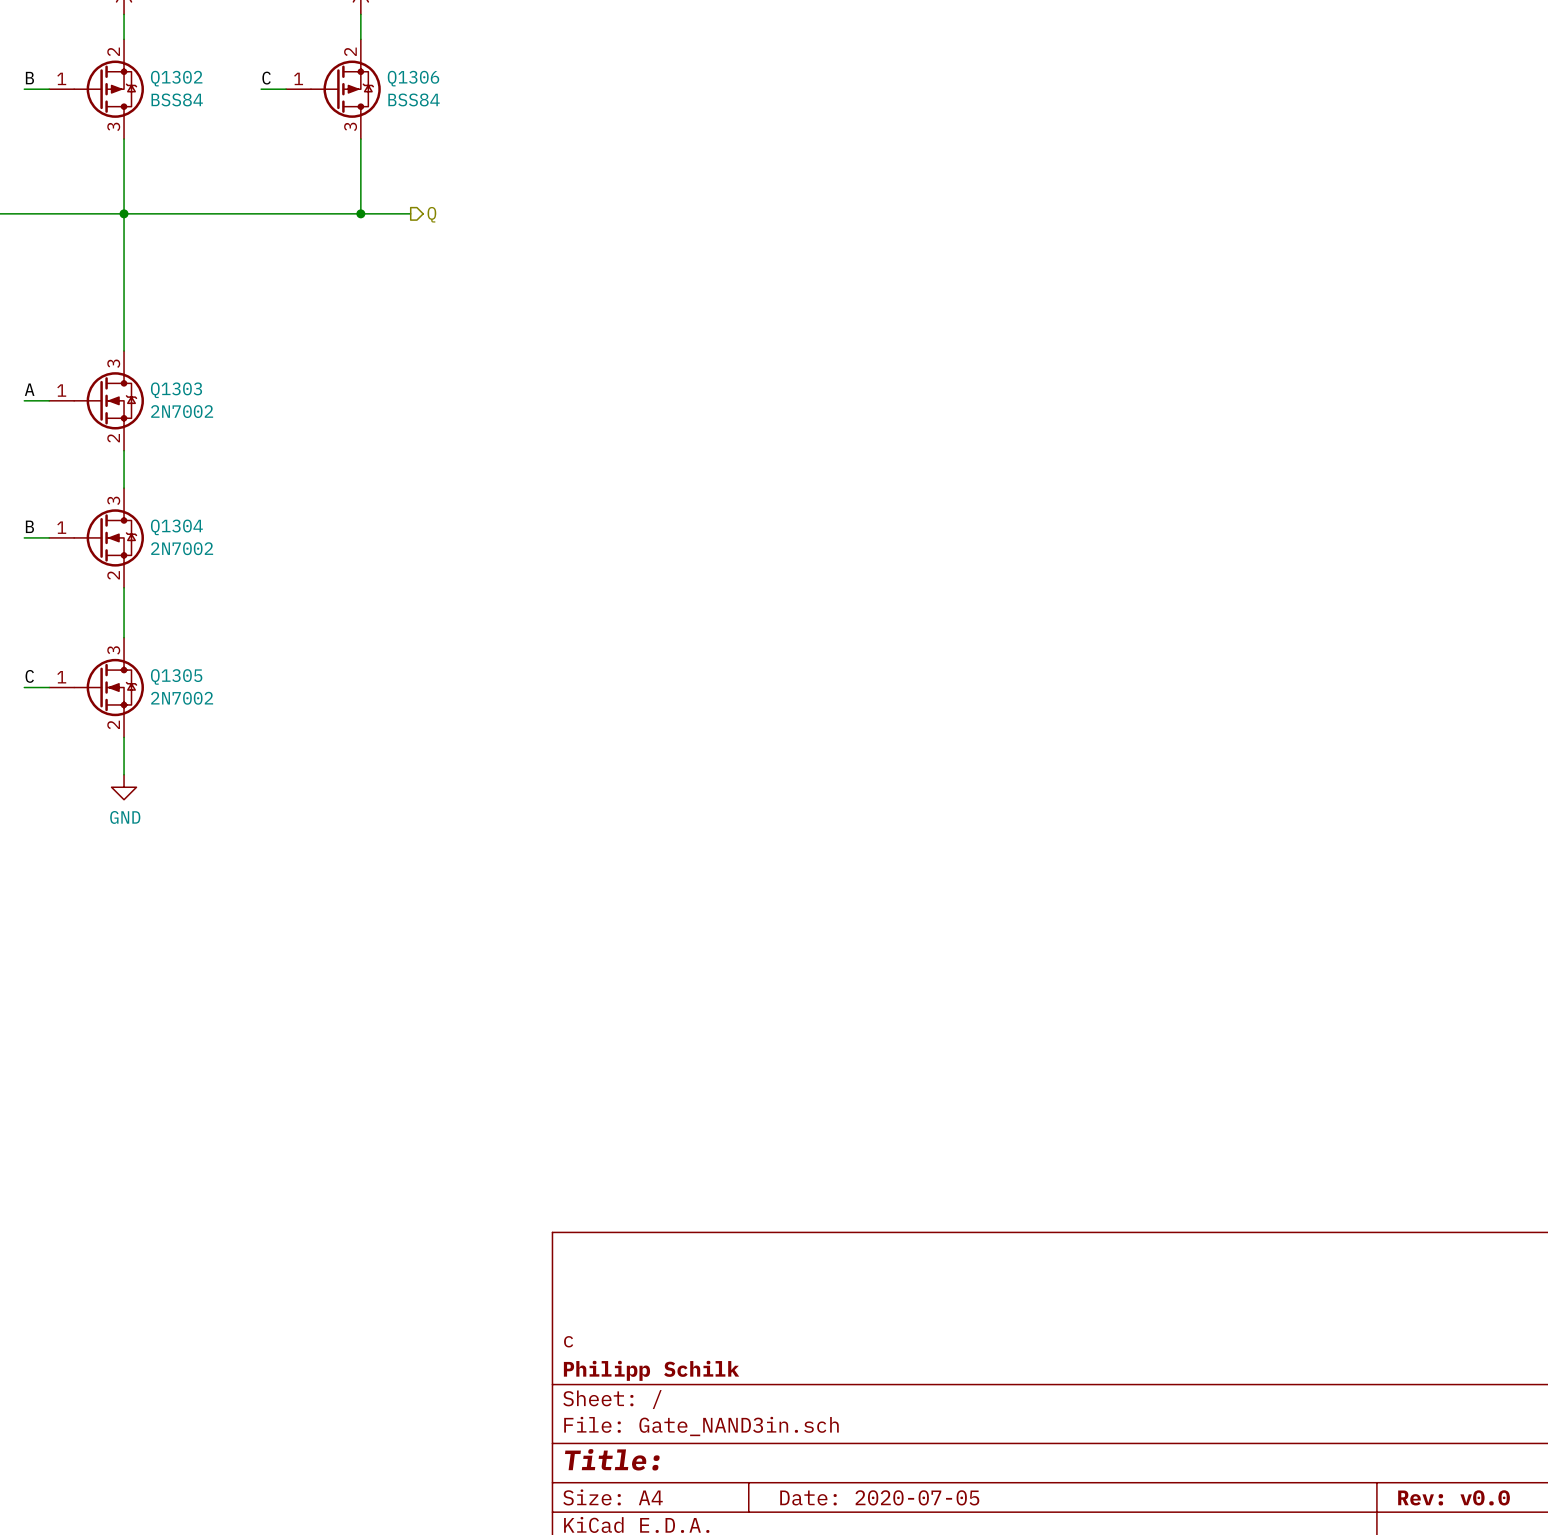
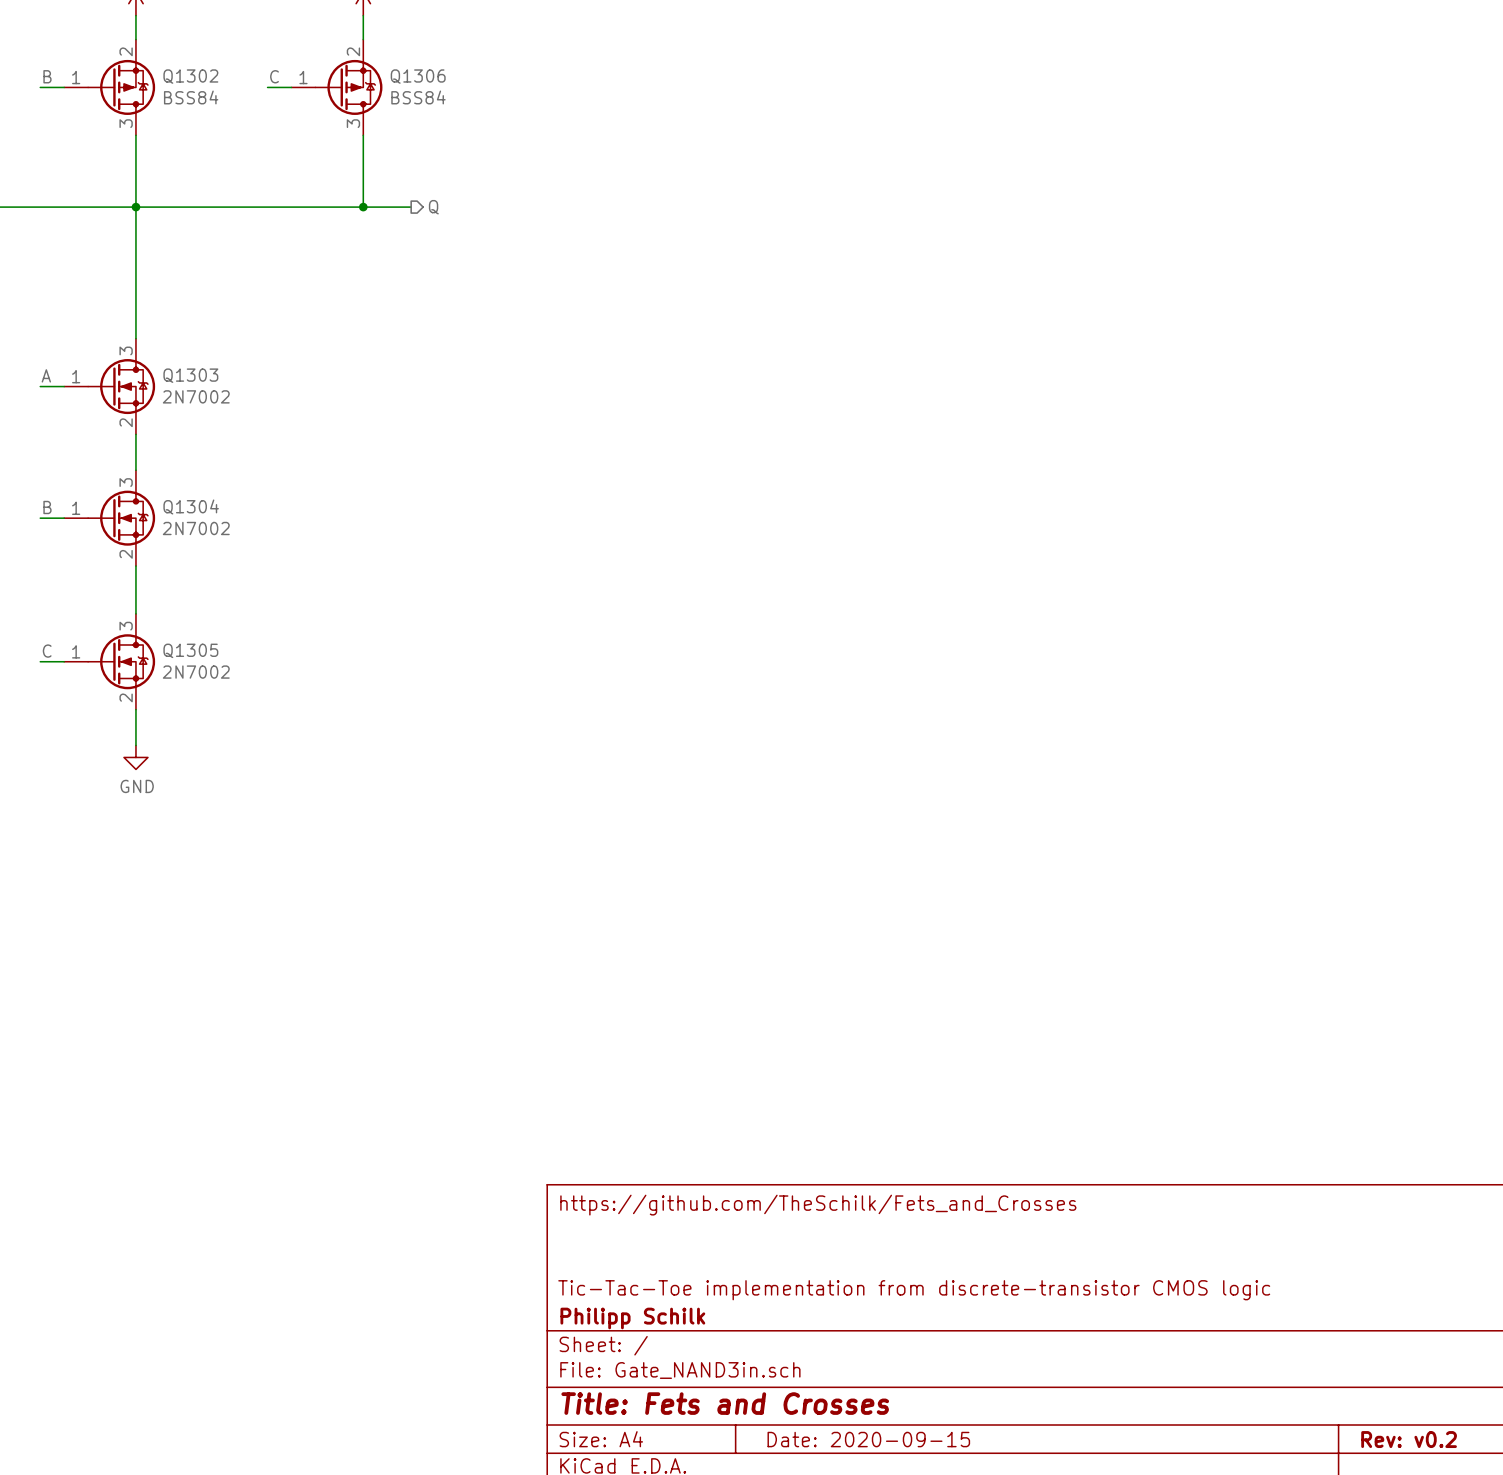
title block: none -> https://github.com/TheSchilk/Fets_and_Crosses (818, 1205)
title block: c (568, 1341) -> Tic-Tac-Toe implementation from discrete-transistor CMOS logic (914, 1290)
title block: Title: (612, 1459) -> Title: Fets and Crosses (725, 1403)
title block: Date: 2020-07-05 (879, 1497) -> Date: 2020-09-15 (868, 1439)
title block: Rev: v0.0 (1454, 1497) -> Rev: v0.2 (1409, 1439)

